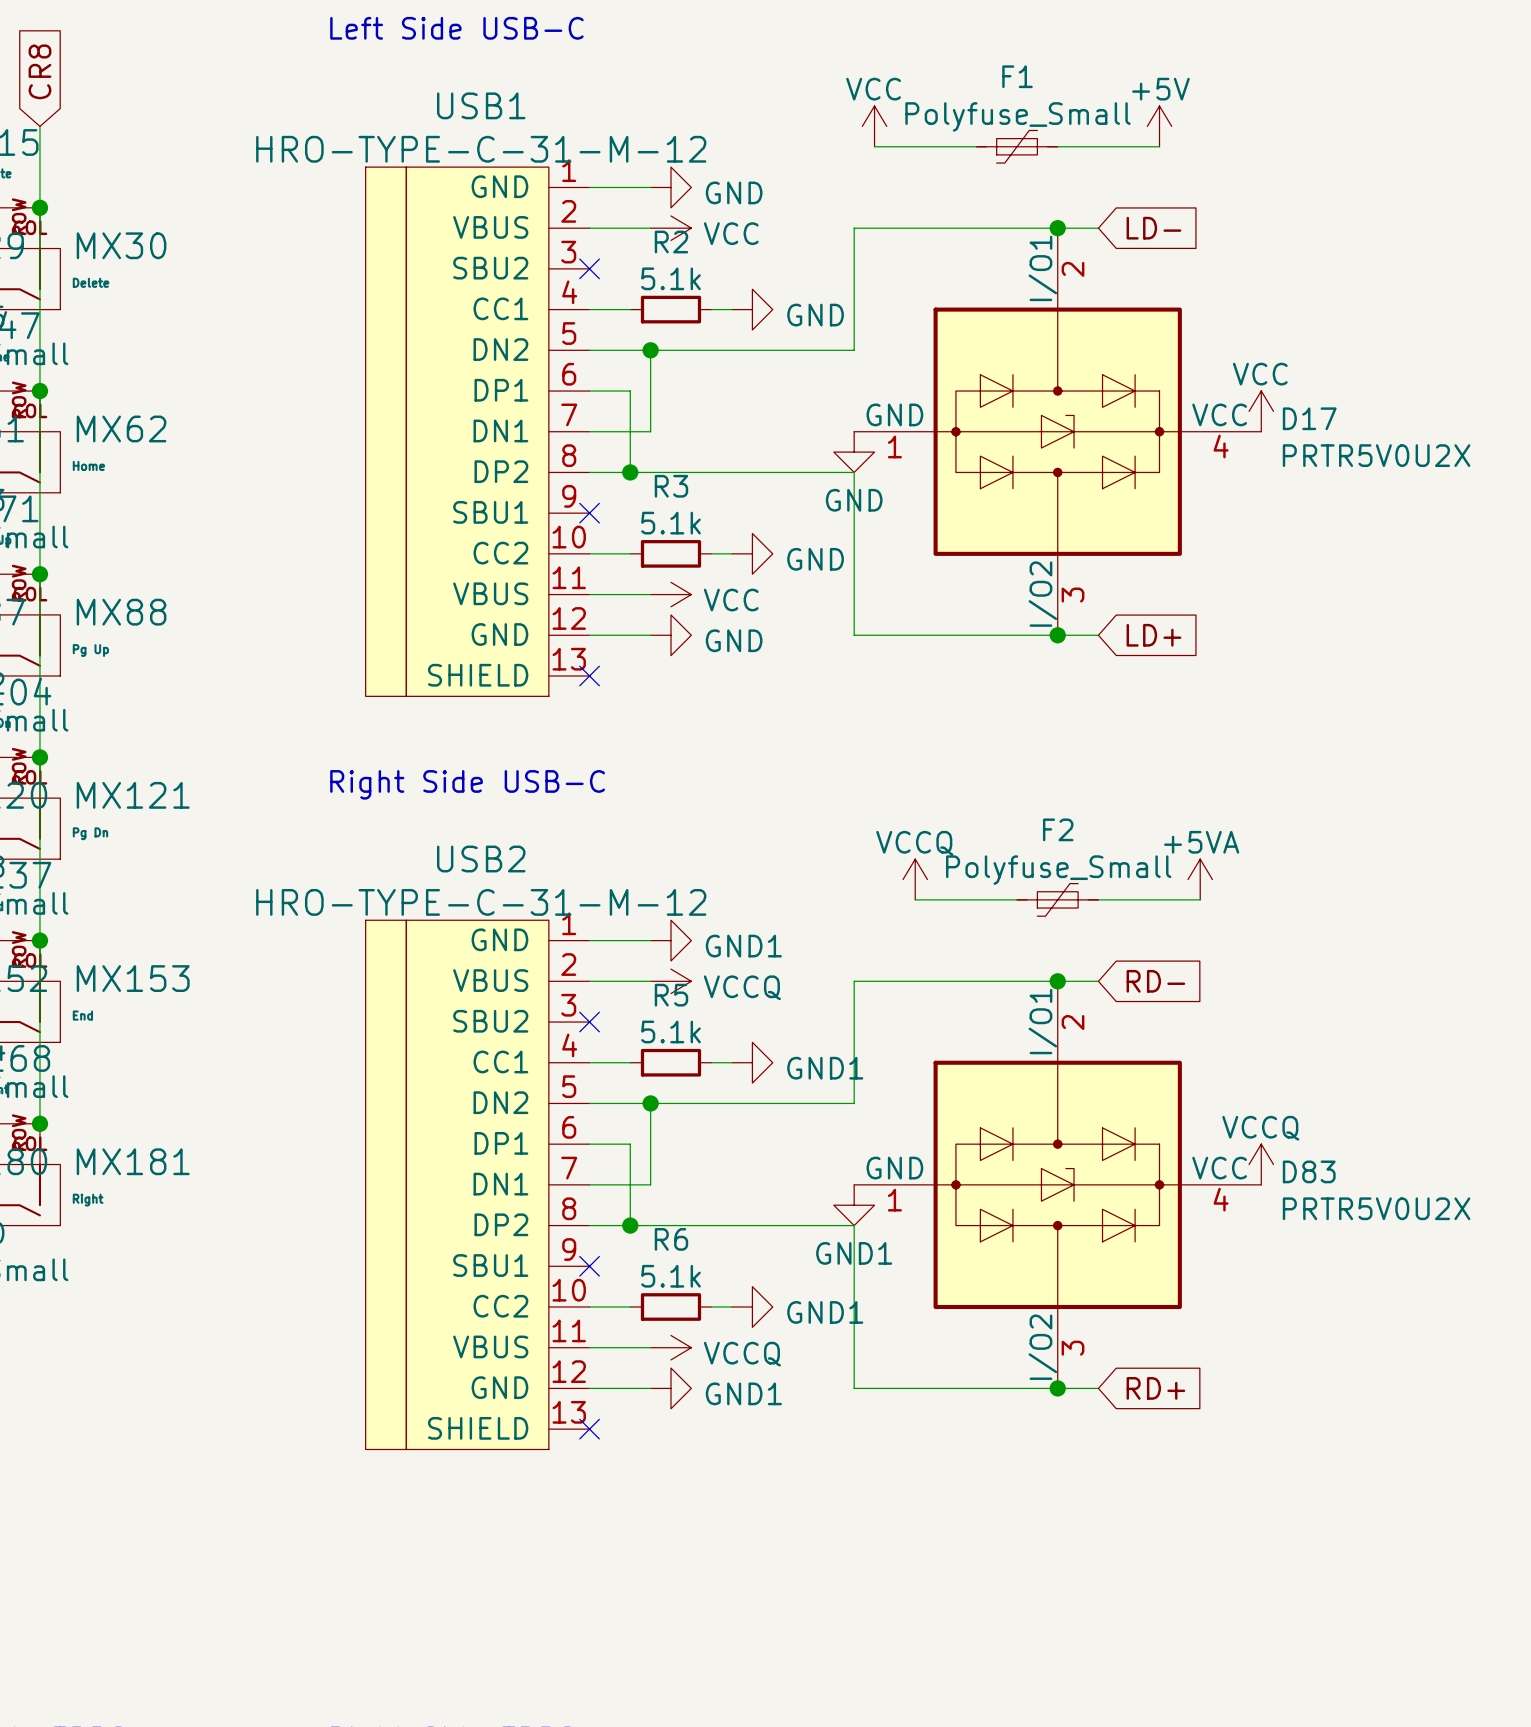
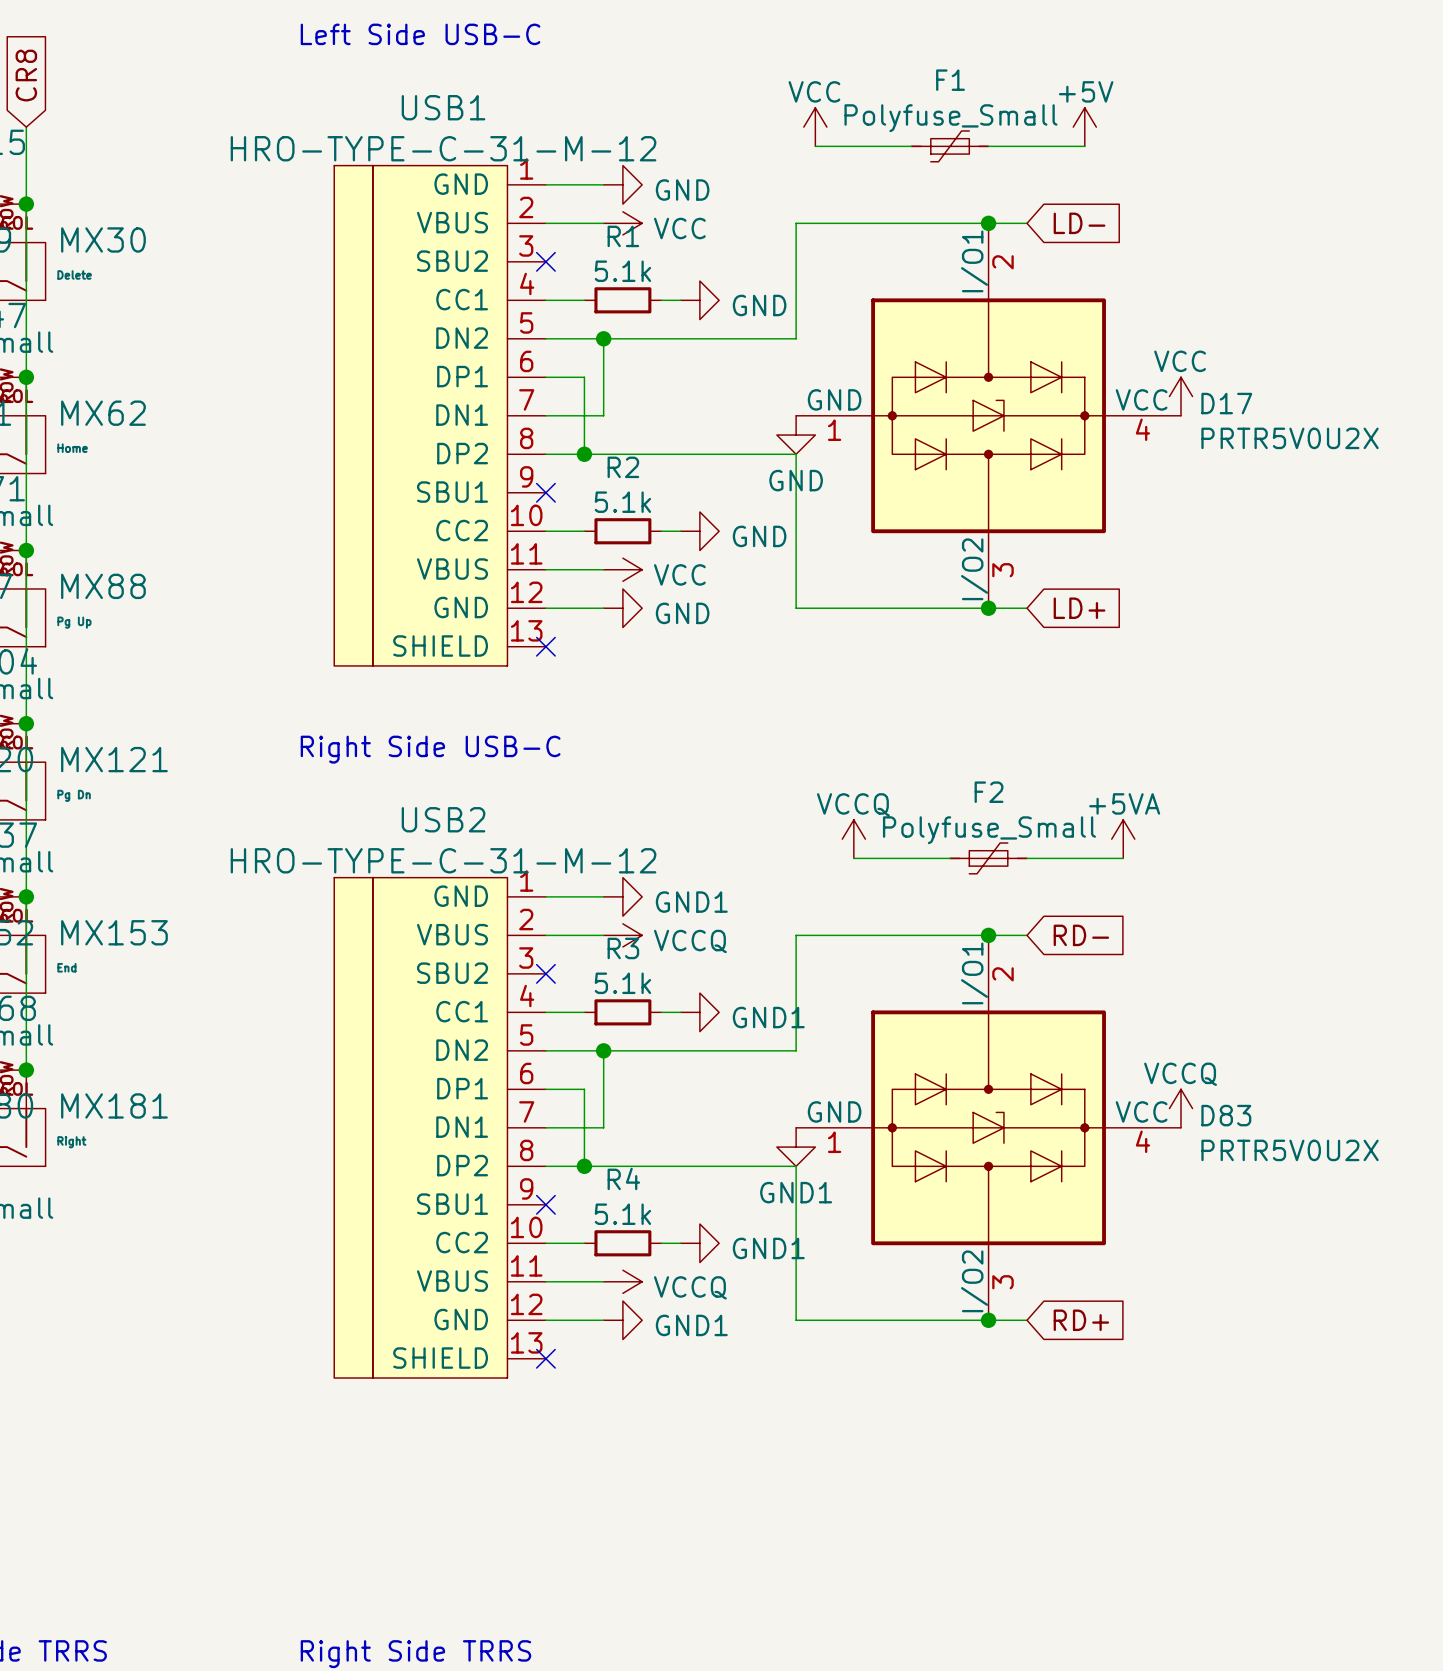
R2 name: R2 (671, 242) -> R1 (623, 236)
R3 name: R3 (671, 486) -> R2 (623, 467)
R5 name: R5 (671, 995) -> R3 (623, 948)
R6 name: R6 (671, 1239) -> R4 (623, 1178)

